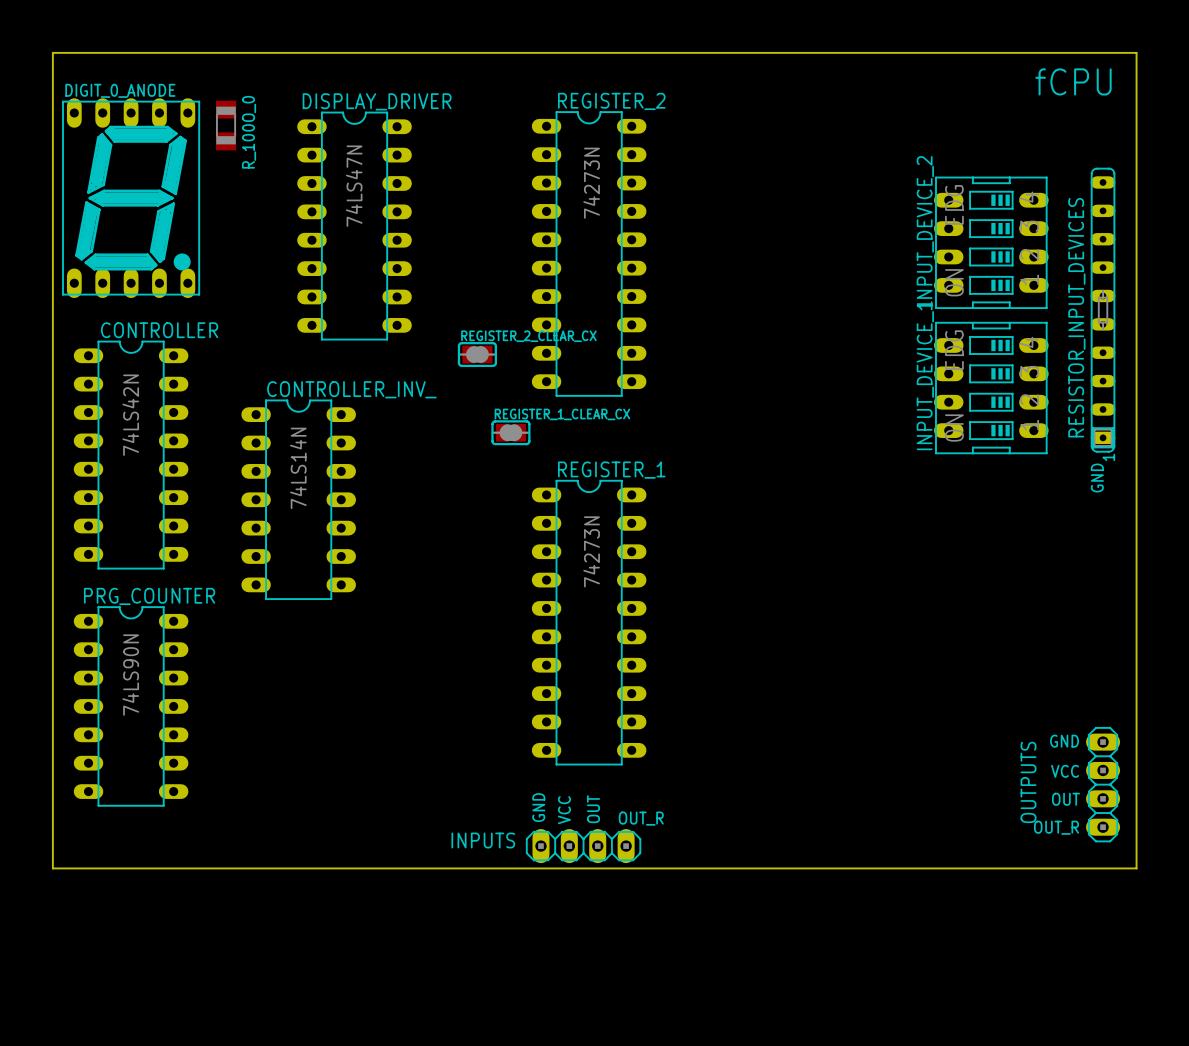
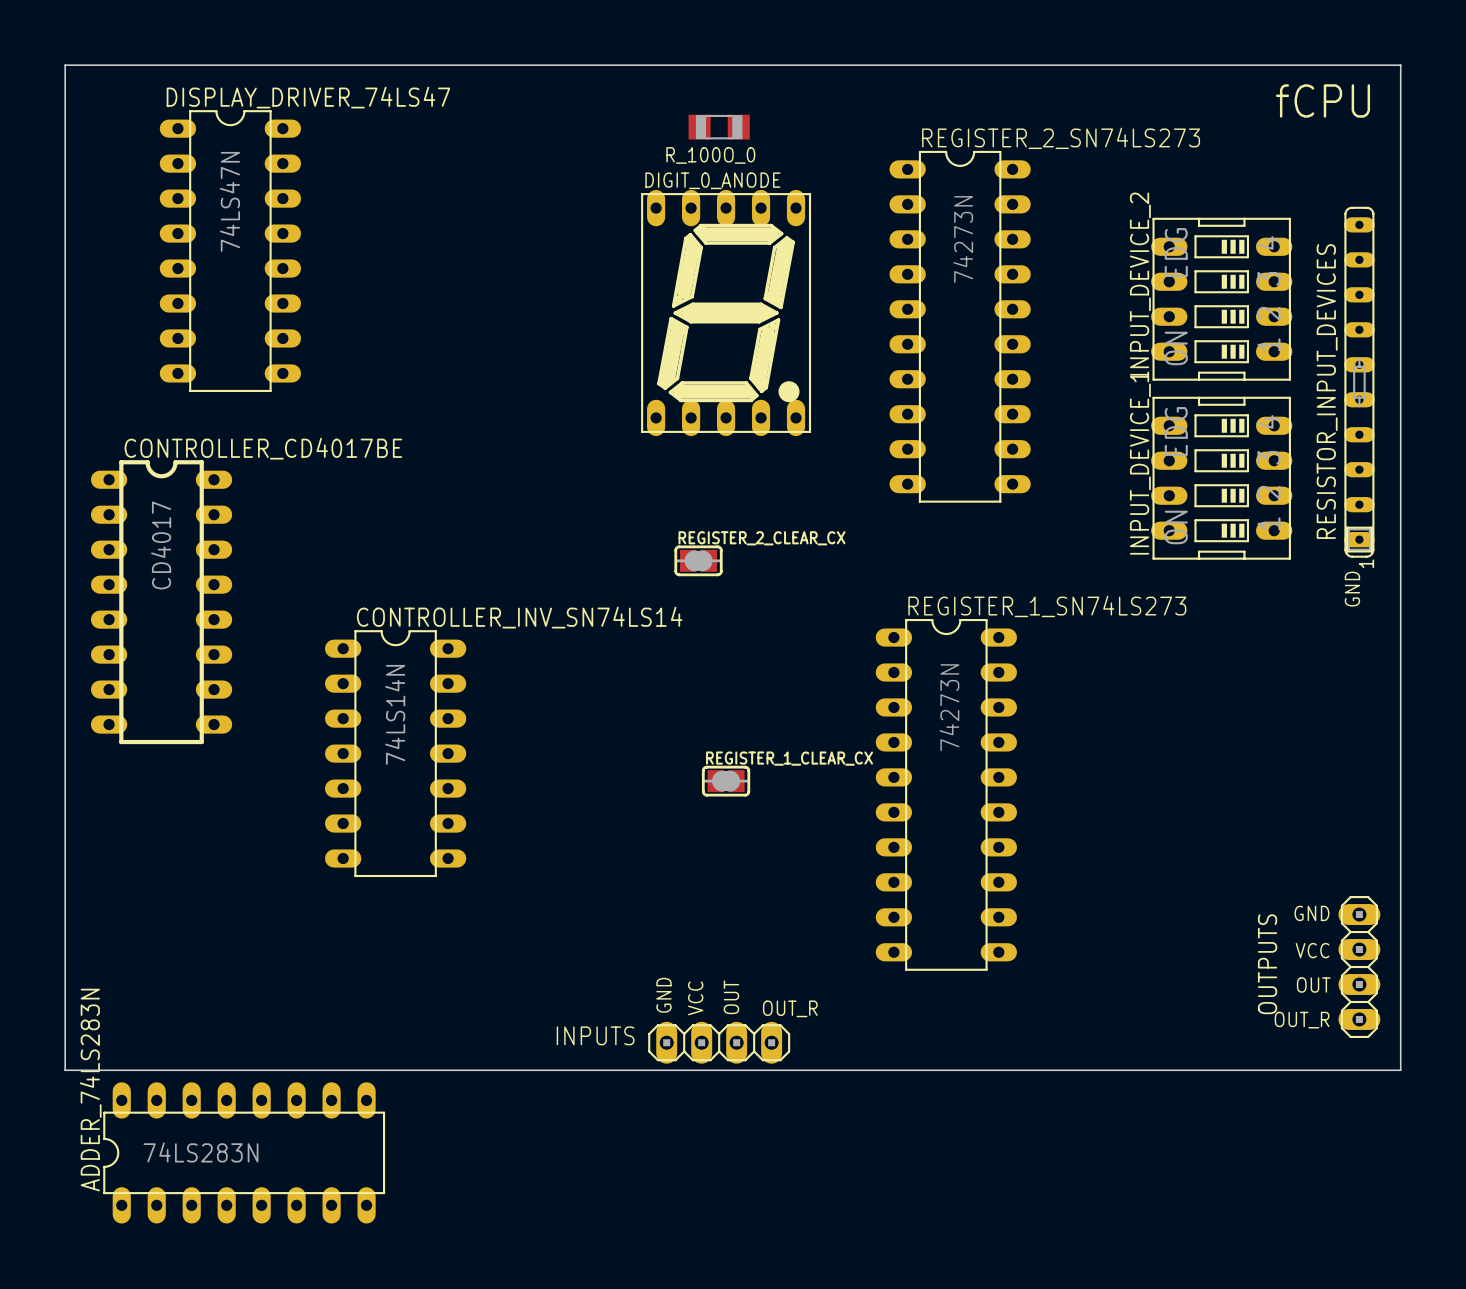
R_100O_0 rotation: 0° (226, 125) -> 90° clockwise (719, 127)
R_100O_0 position: (226, 125) -> (719, 127)
DIGIT_0_ANODE position: (131, 198) -> (726, 313)
DISPLAY_DRIVER_74LS47: none -> 74LS47N (230, 251)
DISPLAY_DRIVER: 74LS47N (354, 226) -> none
REGISTER_2: 74273N (589, 253) -> none
REGISTER_2_SN74LS273: none -> 74273N (960, 326)
REGISTER_2_CLEAR_CX position: (477, 354) -> (698, 560)
REGISTER_1_CLEAR_CX position: (510, 432) -> (726, 781)
CONTROLLER: 74LS42N (131, 455) -> none
CONTROLLER_CD4017BE: none -> CD4017 (161, 602)
CONTROLLER_INV_: 74LS14N (298, 499) -> none
CONTROLLER_INV_SN74LS14: none -> 74LS14N (395, 753)
REGISTER_1: 74273N (589, 622) -> none
REGISTER_1_SN74LS273: none -> 74273N (946, 794)
PRG_COUNTER: 74LS90N (131, 706) -> none
ADDER_74LS283N: none -> 74LS283N (244, 1152)

